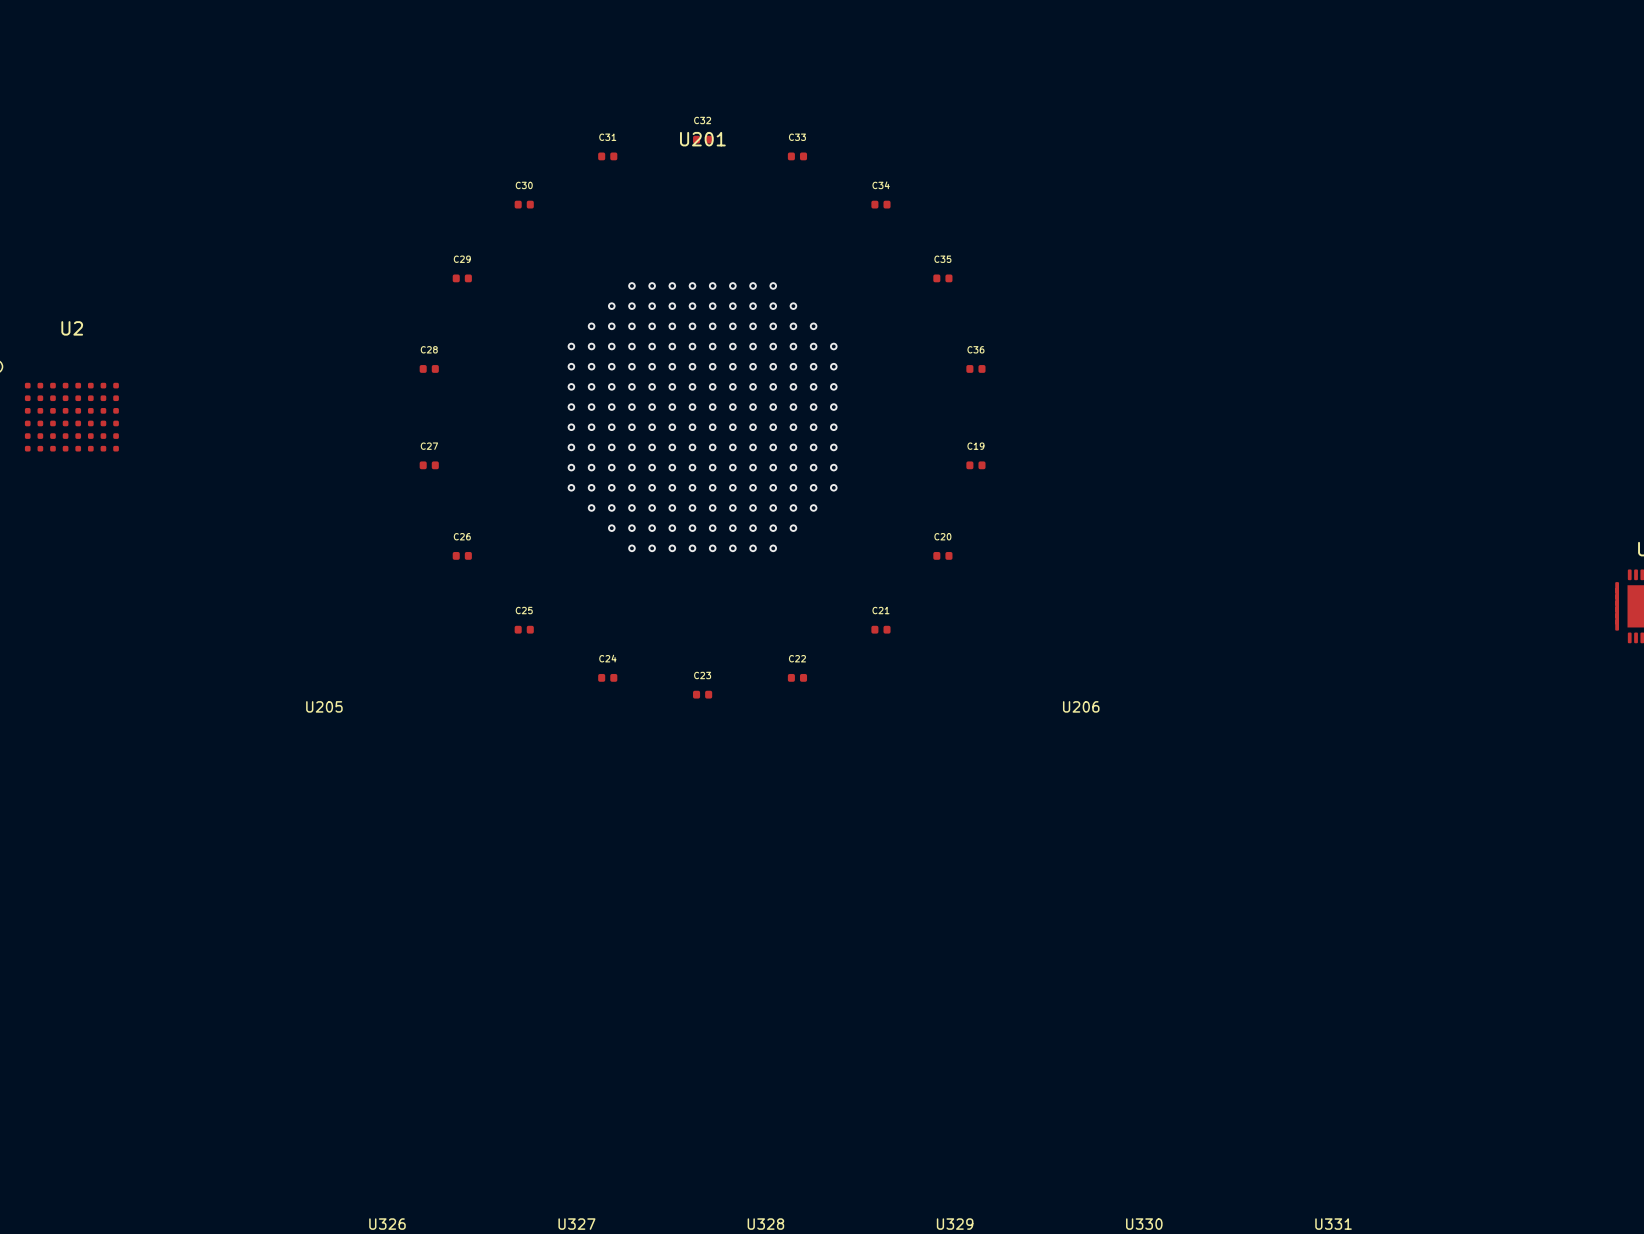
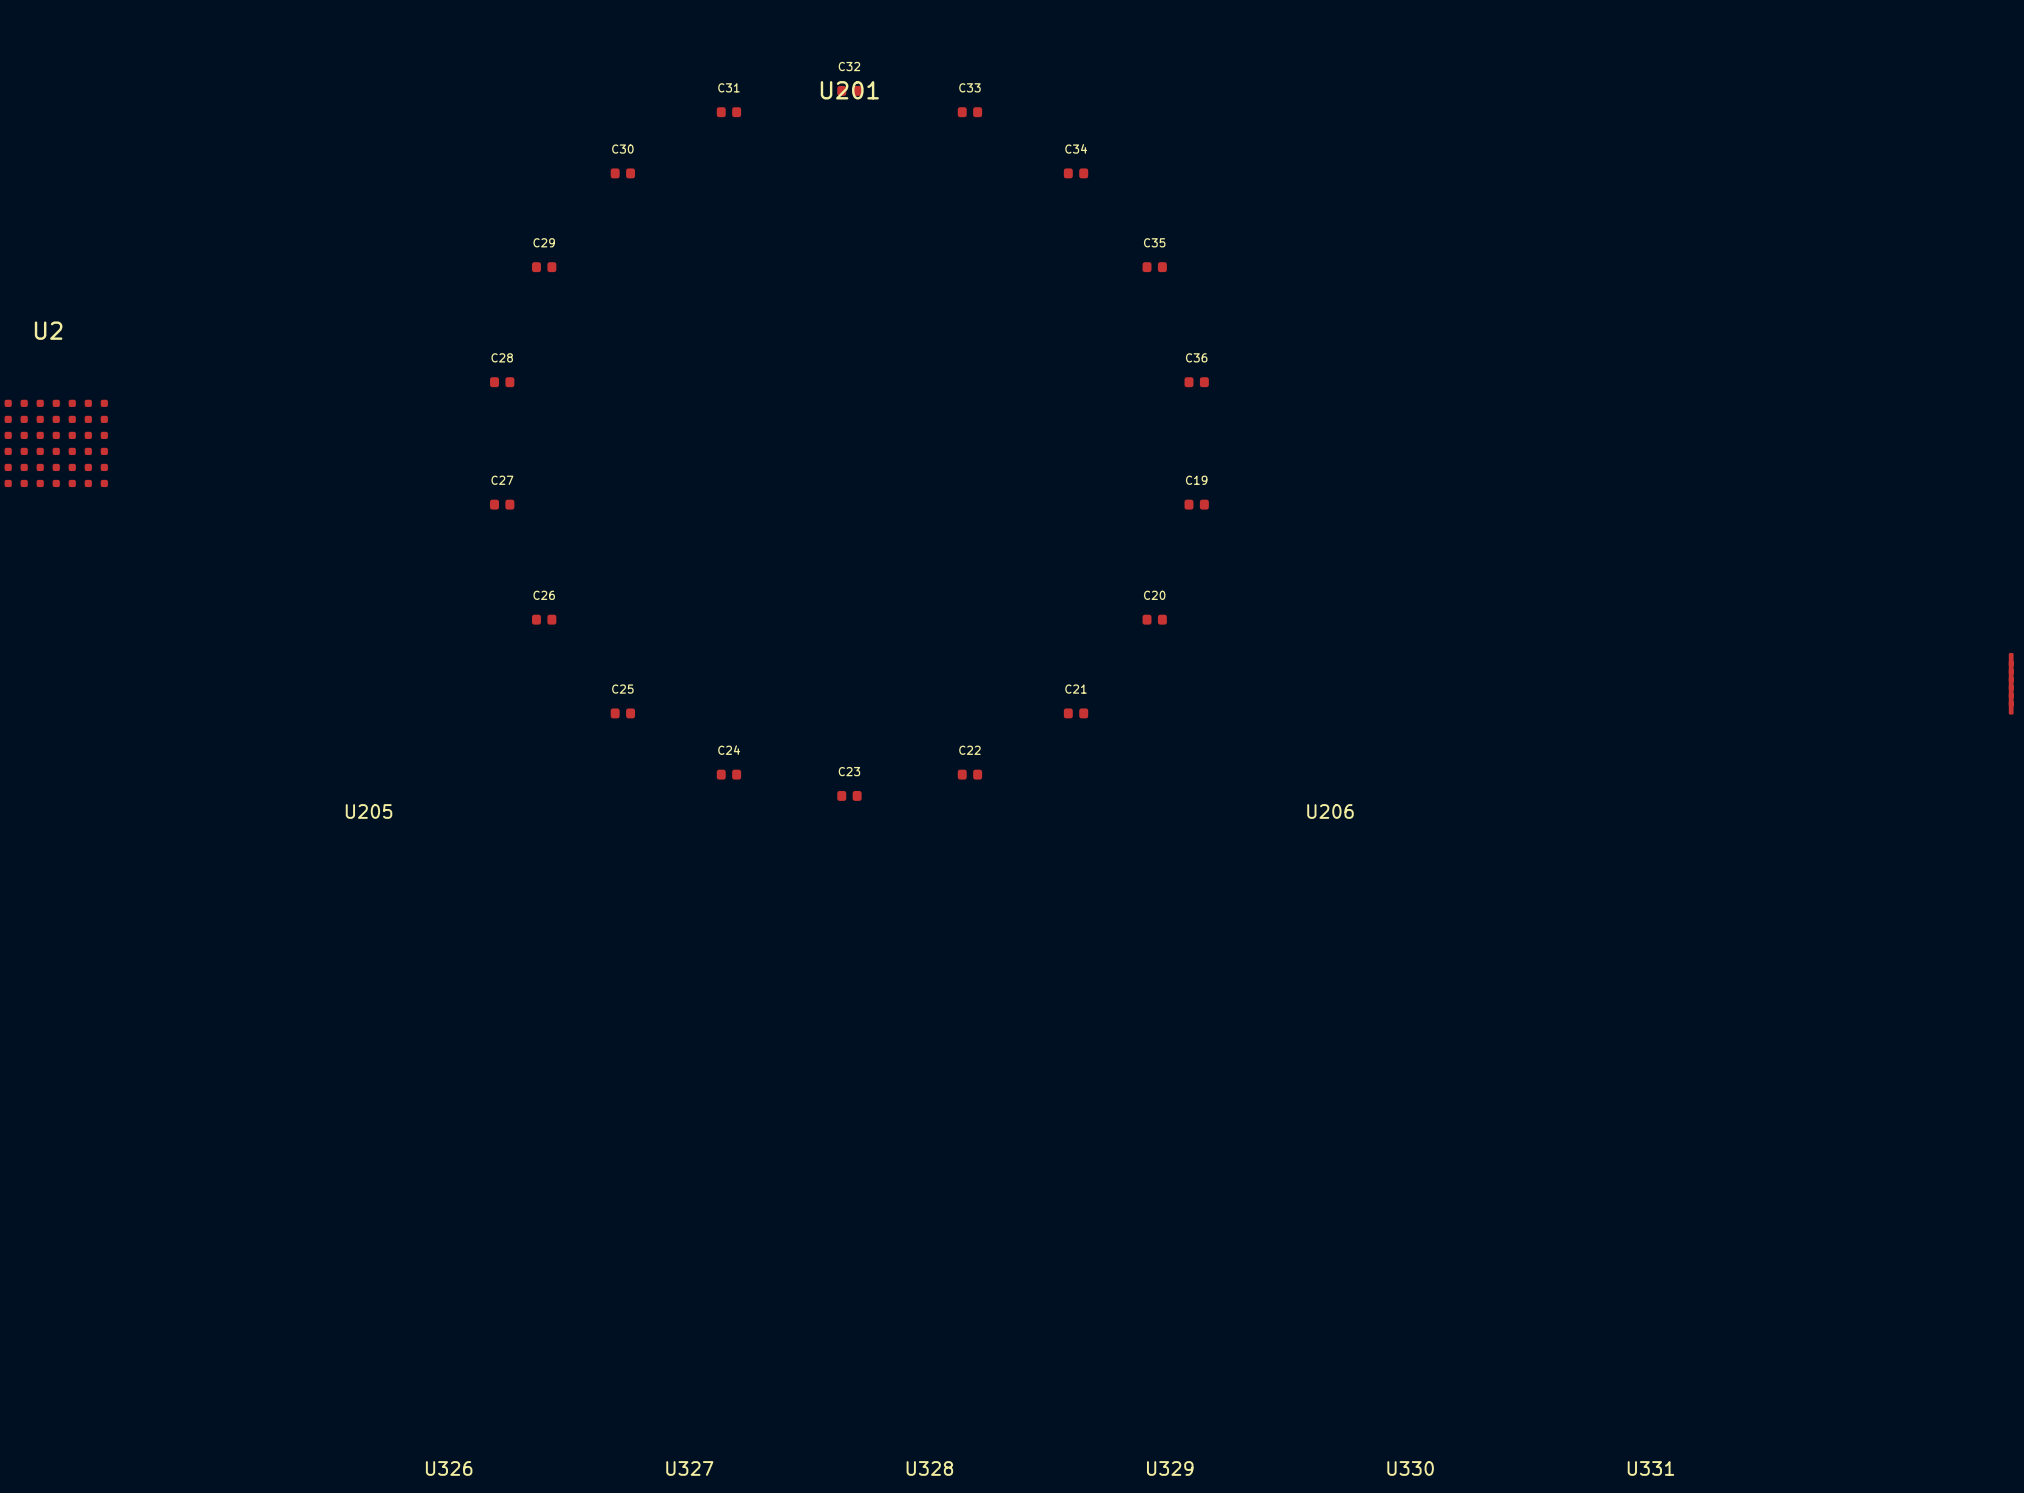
via: (631, 285) -> none
via: (652, 285) -> none
via: (672, 285) -> none
via: (692, 285) -> none
via: (712, 285) -> none
via: (732, 285) -> none
via: (753, 285) -> none
via: (773, 285) -> none
via: (611, 306) -> none
via: (631, 306) -> none
via: (652, 306) -> none
via: (672, 306) -> none
via: (692, 306) -> none
via: (712, 306) -> none
via: (732, 306) -> none
via: (753, 306) -> none
via: (773, 306) -> none
via: (793, 306) -> none
via: (591, 326) -> none
via: (611, 326) -> none
via: (631, 326) -> none
via: (652, 326) -> none
via: (672, 326) -> none
via: (692, 326) -> none
via: (712, 326) -> none
via: (732, 326) -> none
via: (753, 326) -> none
via: (773, 326) -> none
via: (793, 326) -> none
via: (813, 326) -> none
via: (571, 346) -> none
via: (591, 346) -> none
via: (611, 346) -> none
via: (631, 346) -> none
via: (652, 346) -> none
via: (672, 346) -> none
via: (692, 346) -> none
via: (712, 346) -> none
via: (732, 346) -> none
via: (753, 346) -> none
via: (773, 346) -> none
via: (793, 346) -> none
via: (813, 346) -> none
via: (833, 346) -> none
via: (571, 366) -> none
via: (591, 366) -> none
via: (611, 366) -> none
via: (631, 366) -> none
via: (652, 366) -> none
via: (672, 366) -> none
via: (692, 366) -> none
via: (712, 366) -> none
via: (732, 366) -> none
via: (753, 366) -> none
via: (773, 366) -> none
via: (793, 366) -> none
via: (813, 366) -> none
via: (833, 366) -> none
via: (571, 386) -> none
via: (591, 386) -> none
via: (611, 386) -> none
via: (631, 386) -> none
via: (652, 386) -> none
via: (672, 386) -> none
via: (692, 386) -> none
via: (712, 386) -> none
via: (732, 386) -> none
via: (753, 386) -> none
via: (773, 386) -> none
via: (793, 386) -> none
via: (813, 386) -> none
via: (833, 386) -> none
via: (571, 407) -> none
via: (591, 407) -> none
via: (611, 407) -> none
via: (631, 407) -> none
via: (652, 407) -> none
via: (672, 407) -> none
via: (692, 407) -> none
via: (712, 407) -> none
via: (732, 407) -> none
via: (753, 407) -> none
via: (773, 407) -> none
via: (793, 407) -> none
via: (813, 407) -> none
via: (833, 407) -> none
via: (571, 427) -> none
via: (591, 427) -> none
via: (611, 427) -> none
via: (631, 427) -> none
via: (652, 427) -> none
via: (672, 427) -> none
via: (692, 427) -> none
via: (712, 427) -> none
via: (732, 427) -> none
via: (753, 427) -> none
via: (773, 427) -> none
via: (793, 427) -> none
via: (813, 427) -> none
via: (833, 427) -> none
via: (571, 447) -> none
via: (591, 447) -> none
via: (611, 447) -> none
via: (631, 447) -> none
via: (652, 447) -> none
via: (672, 447) -> none
via: (692, 447) -> none
via: (712, 447) -> none
via: (732, 447) -> none
via: (753, 447) -> none
via: (773, 447) -> none
via: (793, 447) -> none
via: (813, 447) -> none
via: (833, 447) -> none
via: (571, 467) -> none
via: (591, 467) -> none
via: (611, 467) -> none
via: (631, 467) -> none
via: (652, 467) -> none
via: (672, 467) -> none
via: (692, 467) -> none
via: (712, 467) -> none
via: (732, 467) -> none
via: (753, 467) -> none
via: (773, 467) -> none
via: (793, 467) -> none
via: (813, 467) -> none
via: (833, 467) -> none
via: (571, 487) -> none
via: (591, 487) -> none
via: (611, 487) -> none
via: (631, 487) -> none
via: (652, 487) -> none
via: (672, 487) -> none
via: (692, 487) -> none
via: (712, 487) -> none
via: (732, 487) -> none
via: (753, 487) -> none
via: (773, 487) -> none
via: (793, 487) -> none
via: (813, 487) -> none
via: (833, 487) -> none
via: (591, 507) -> none
via: (611, 507) -> none
via: (631, 507) -> none
via: (652, 507) -> none
via: (672, 507) -> none
via: (692, 507) -> none
via: (712, 507) -> none
via: (732, 507) -> none
via: (753, 507) -> none
via: (773, 507) -> none
via: (793, 507) -> none
via: (813, 507) -> none
via: (611, 528) -> none
via: (631, 528) -> none
via: (652, 528) -> none
via: (672, 528) -> none
via: (692, 528) -> none
via: (712, 528) -> none
via: (732, 528) -> none
via: (753, 528) -> none
via: (773, 528) -> none
via: (793, 528) -> none
via: (631, 548) -> none
via: (652, 548) -> none
via: (672, 548) -> none
via: (692, 548) -> none
via: (712, 548) -> none
via: (732, 548) -> none
via: (753, 548) -> none
via: (773, 548) -> none

